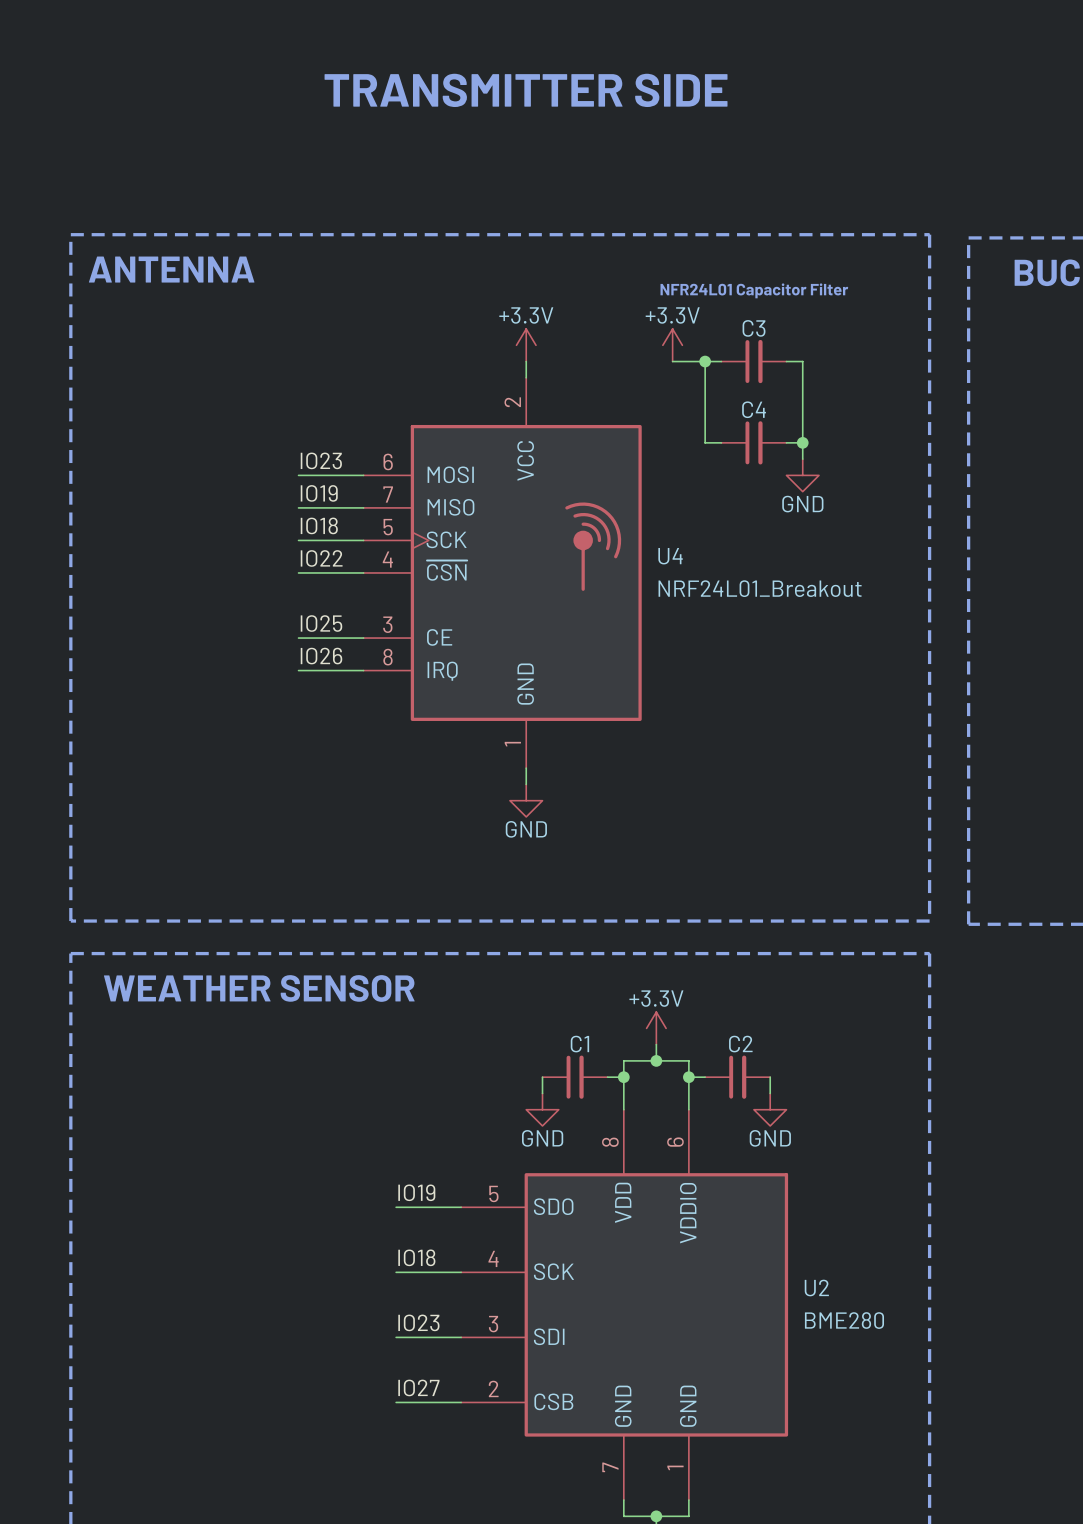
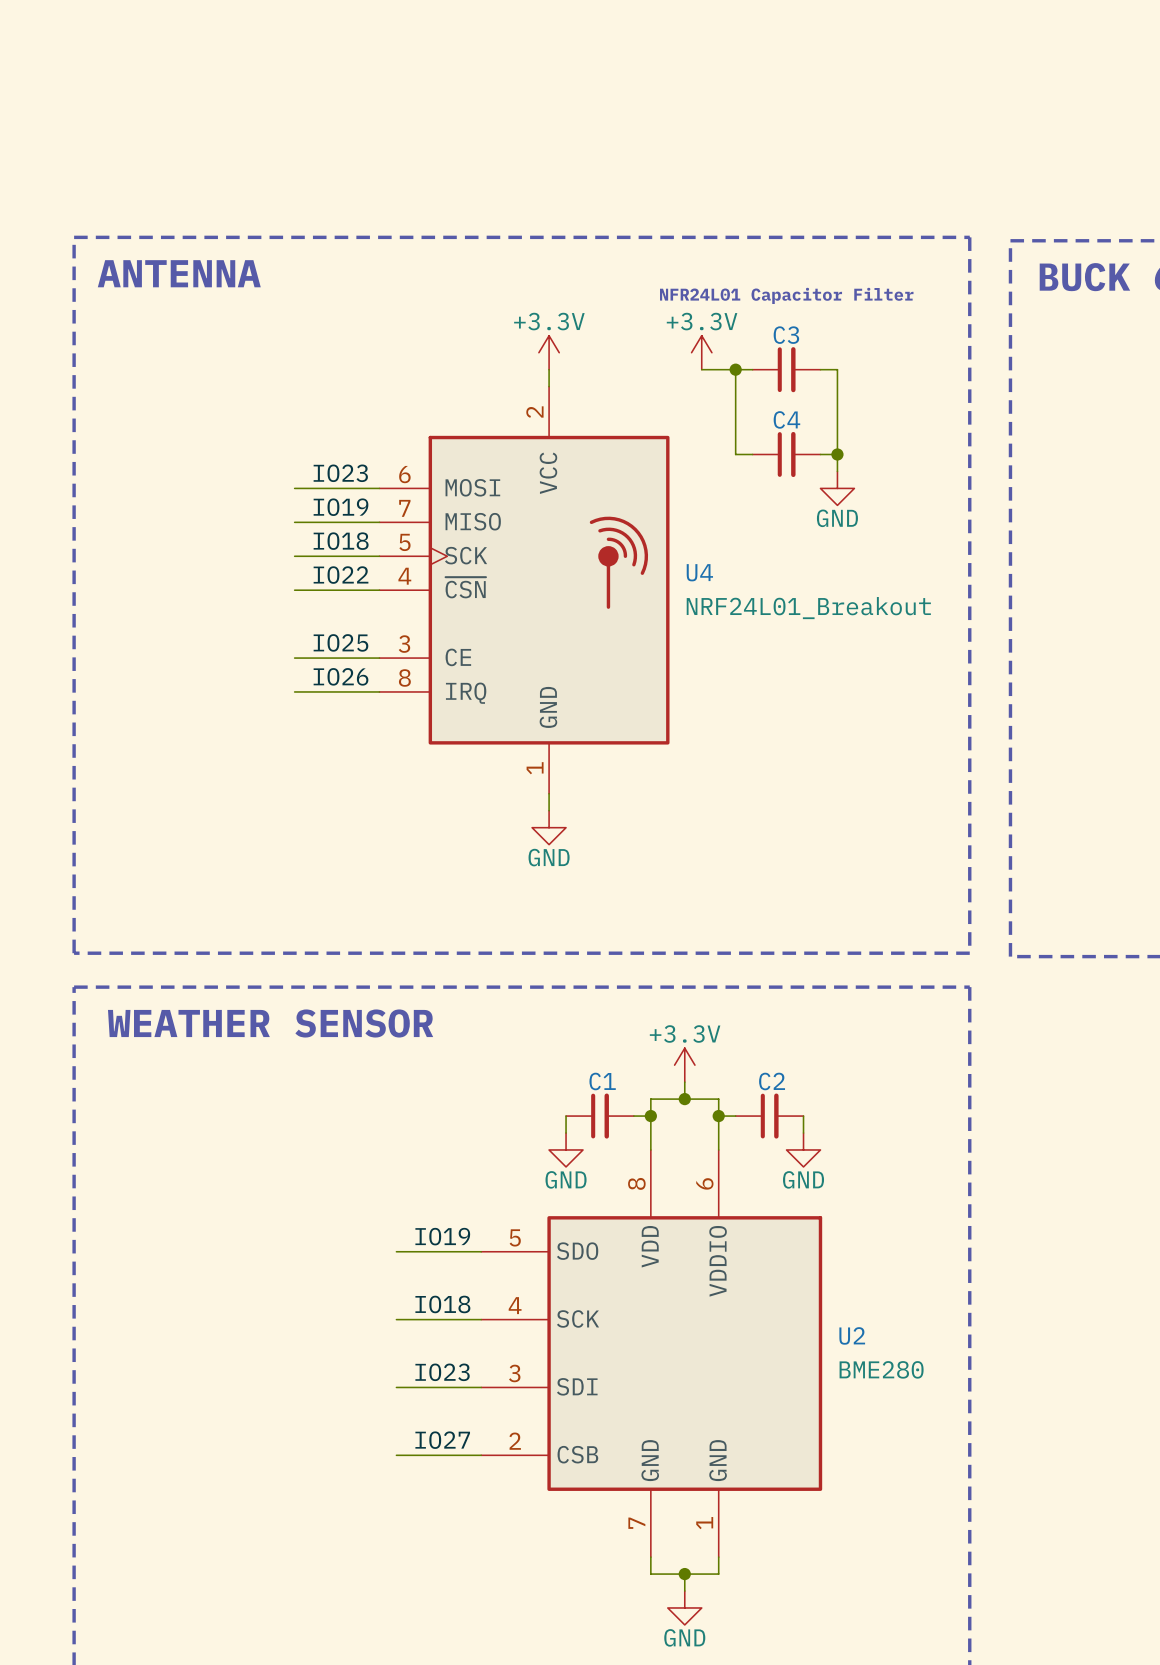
text: TRANSMITTER SIDE (526, 90) -> none
wire: none -> (294, 488) (311, 488)
wire: none -> (294, 522) (311, 522)
wire: none -> (294, 556) (311, 556)
wire: none -> (294, 590) (311, 590)
wire: none -> (294, 658) (311, 658)
wire: none -> (294, 691) (311, 691)
wire: none -> (396, 1251) (413, 1251)
wire: none -> (396, 1319) (413, 1319)
wire: none -> (396, 1387) (413, 1387)
wire: none -> (396, 1455) (413, 1455)

